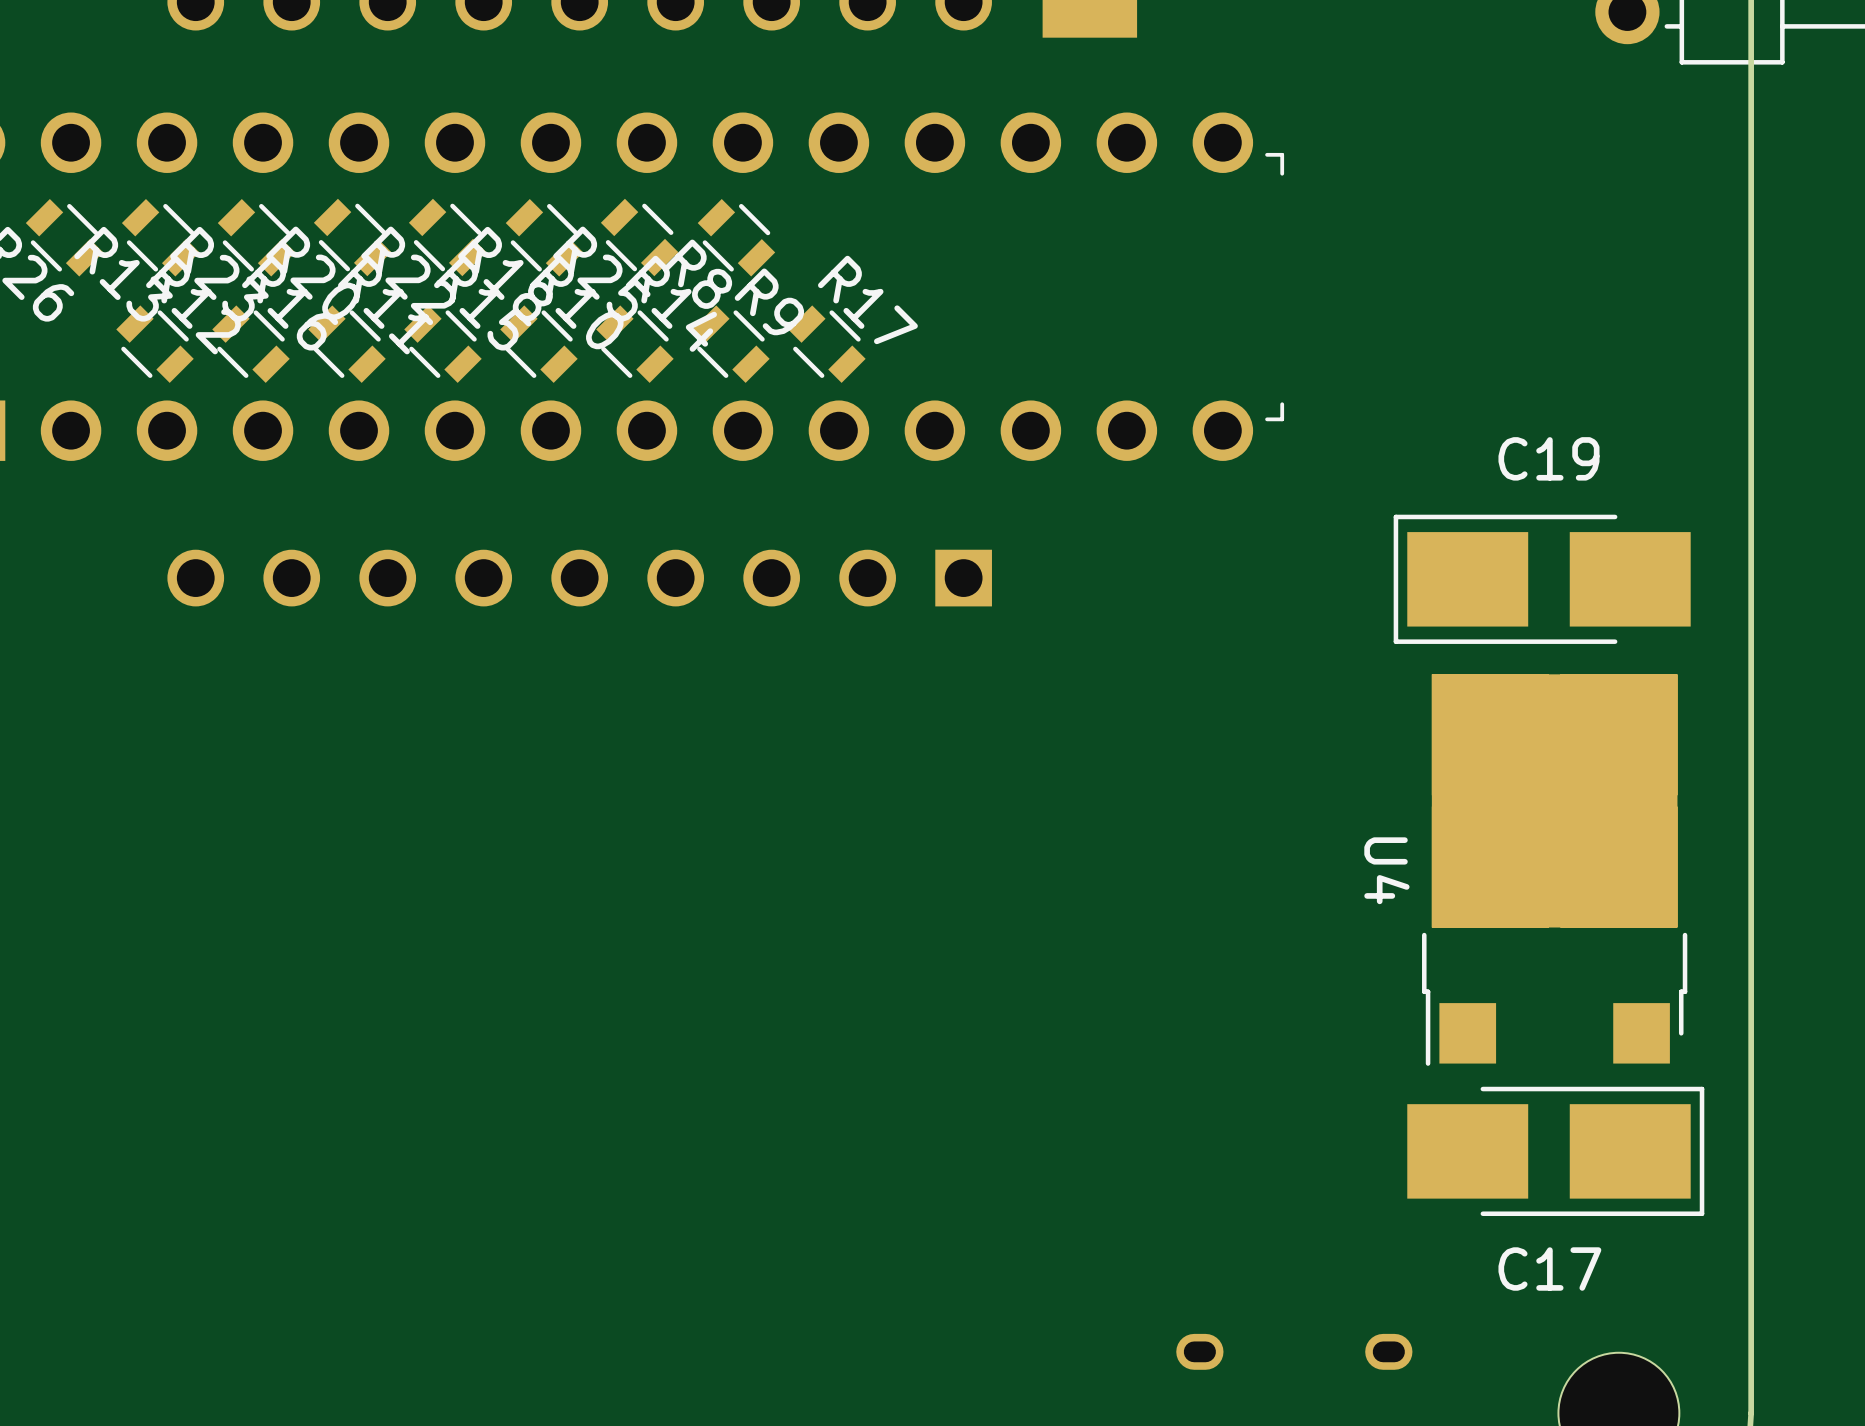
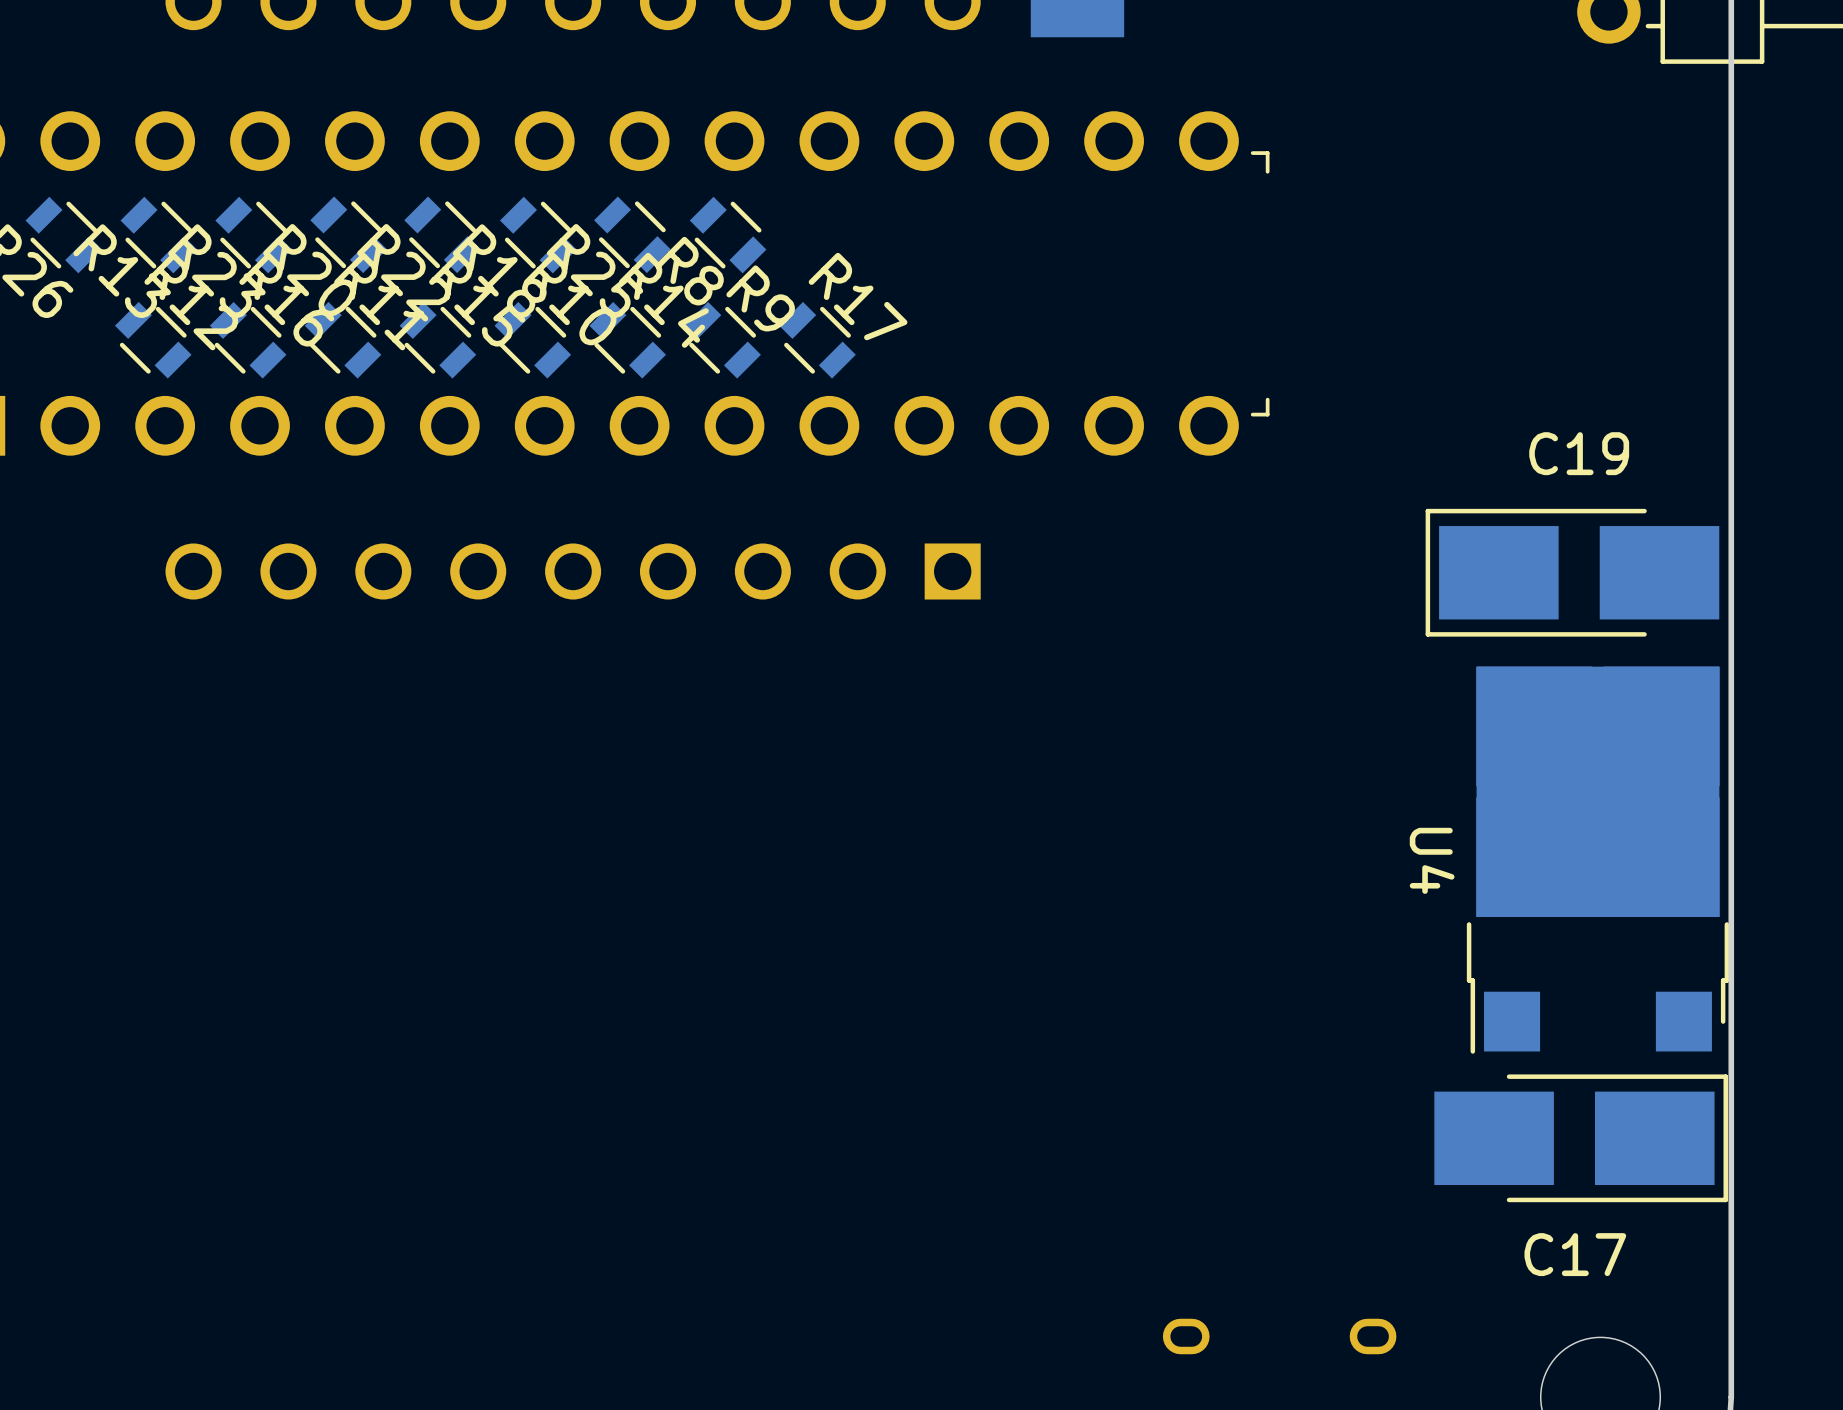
C19 position: (1542, 579) -> (1572, 572)
U4 position: (1554, 870) -> (1597, 860)
C17 position: (1555, 1151) -> (1581, 1138)

